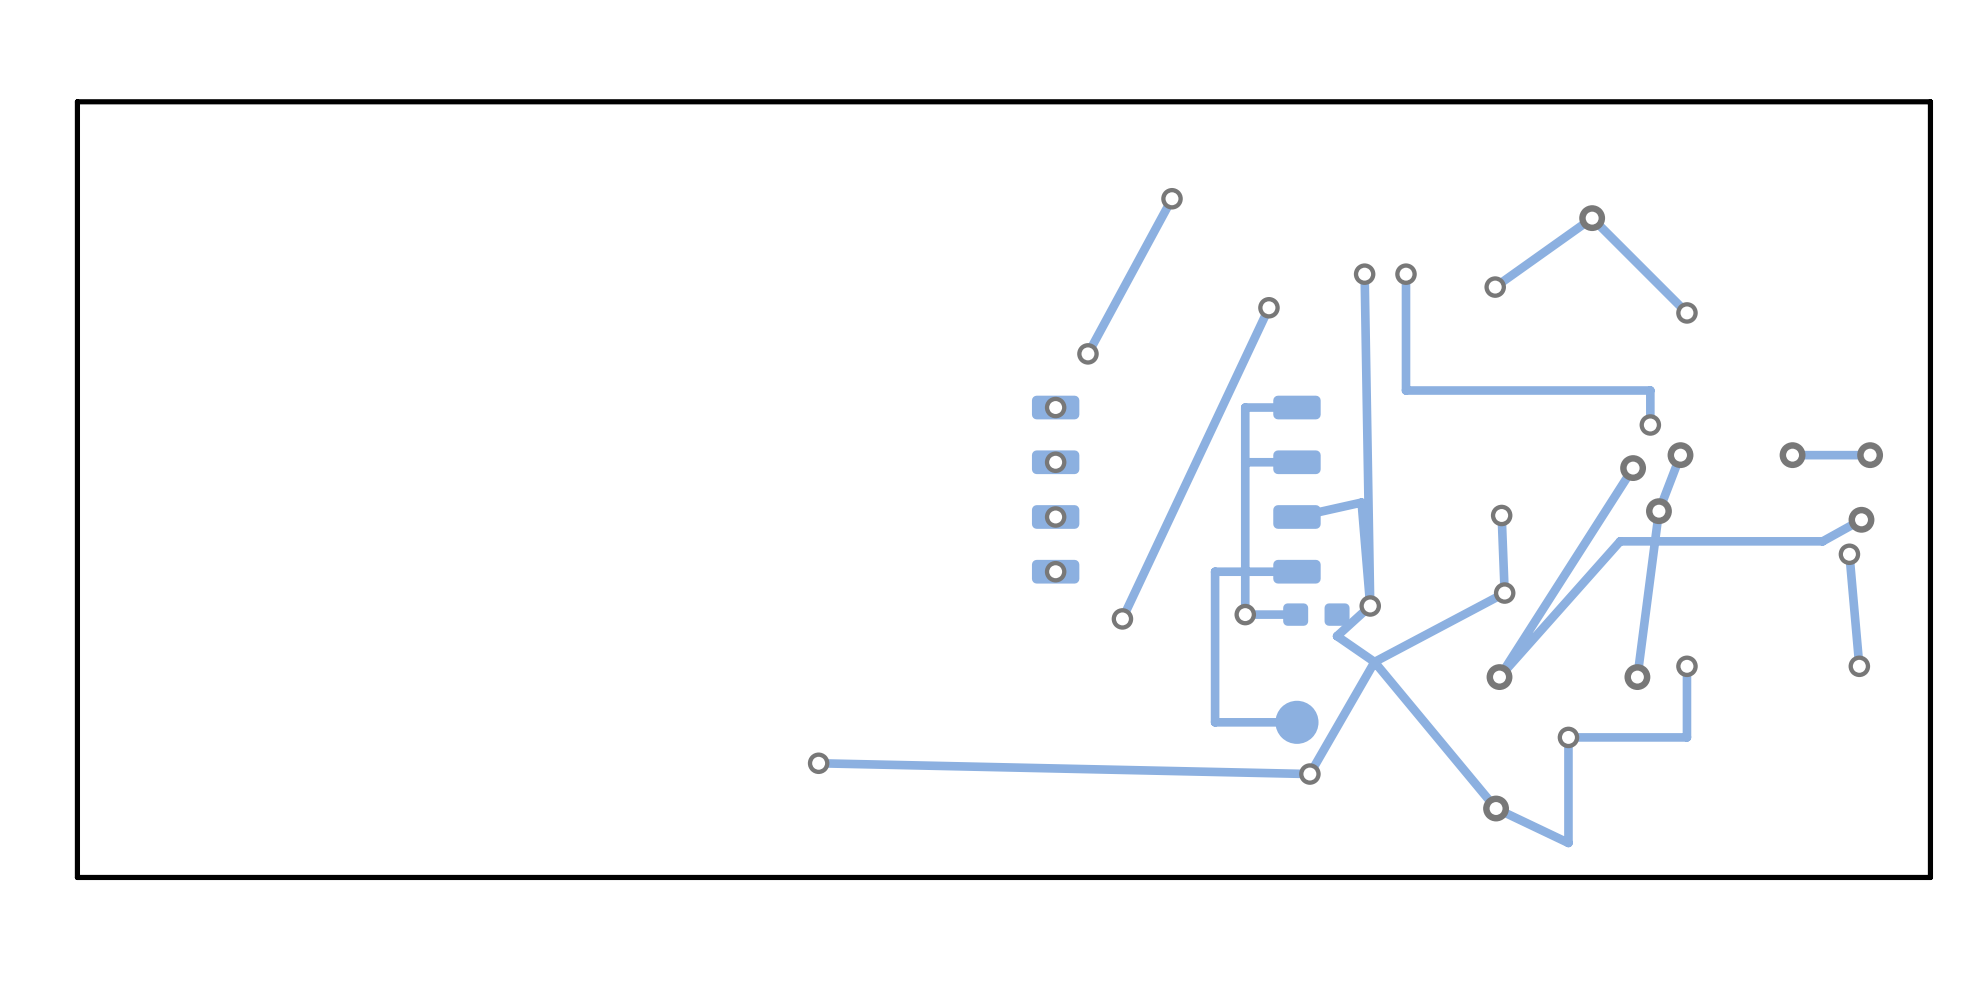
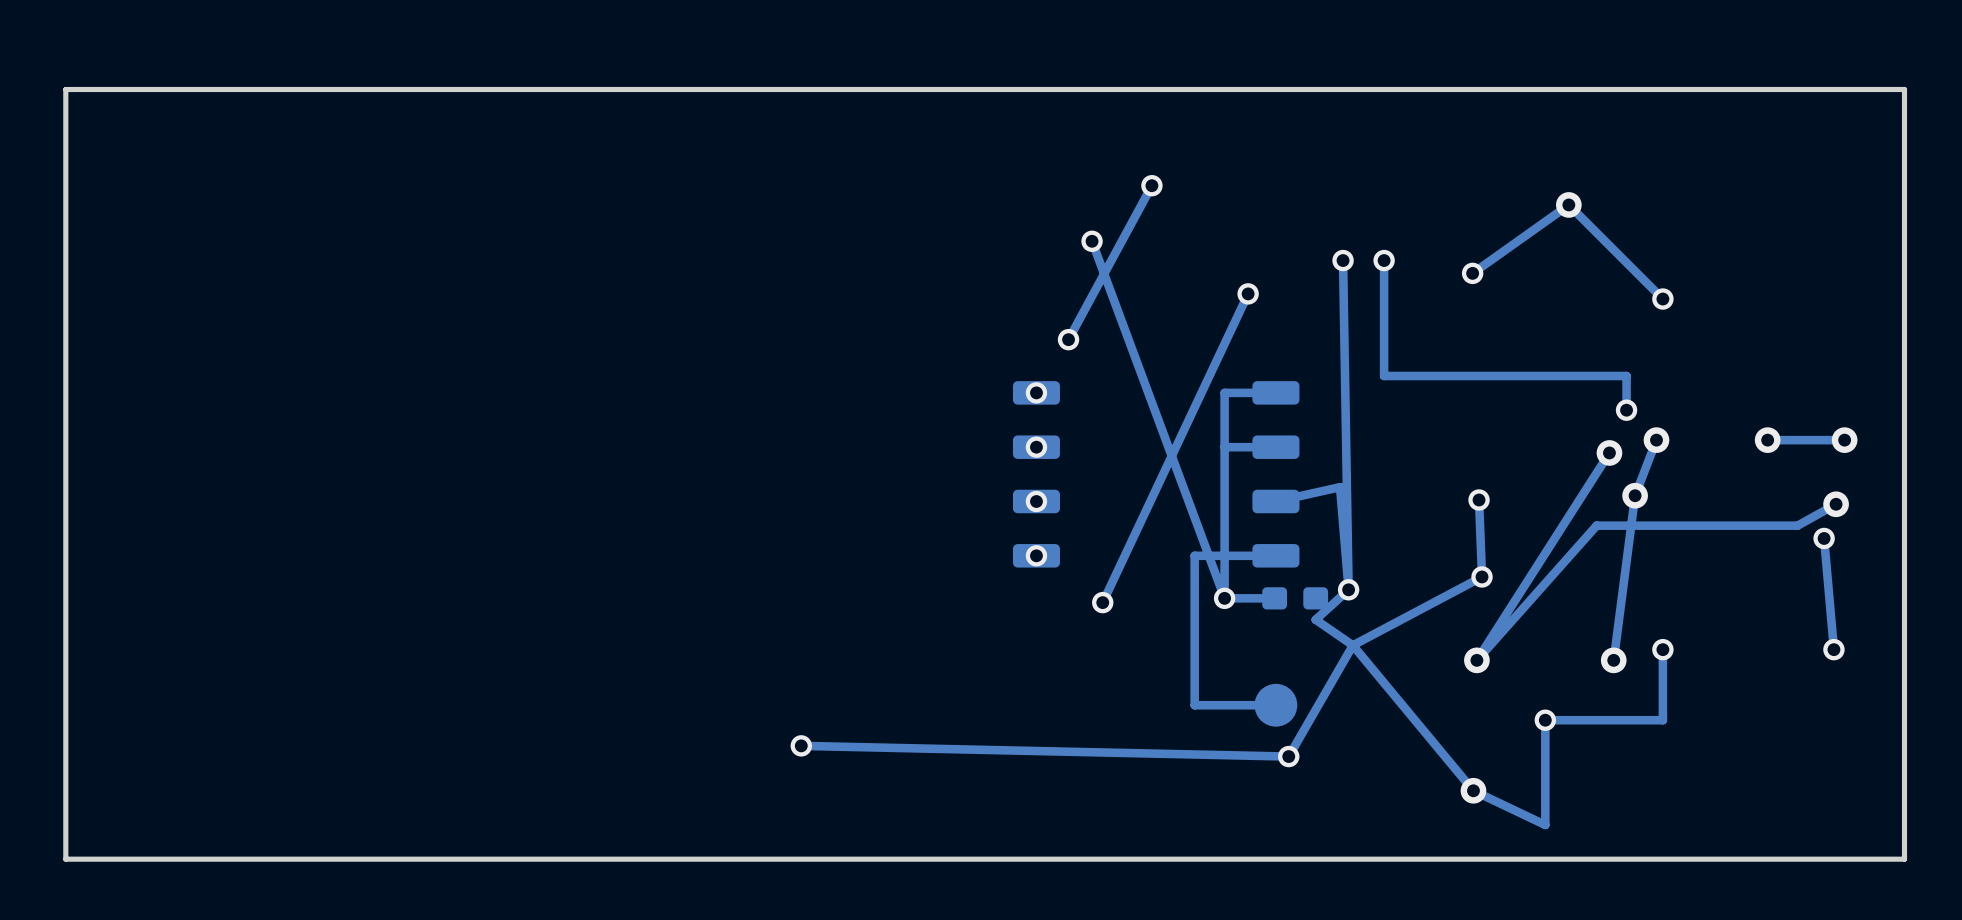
track: none -> (1092, 241) (1224, 598)
via: none -> (1092, 241)

